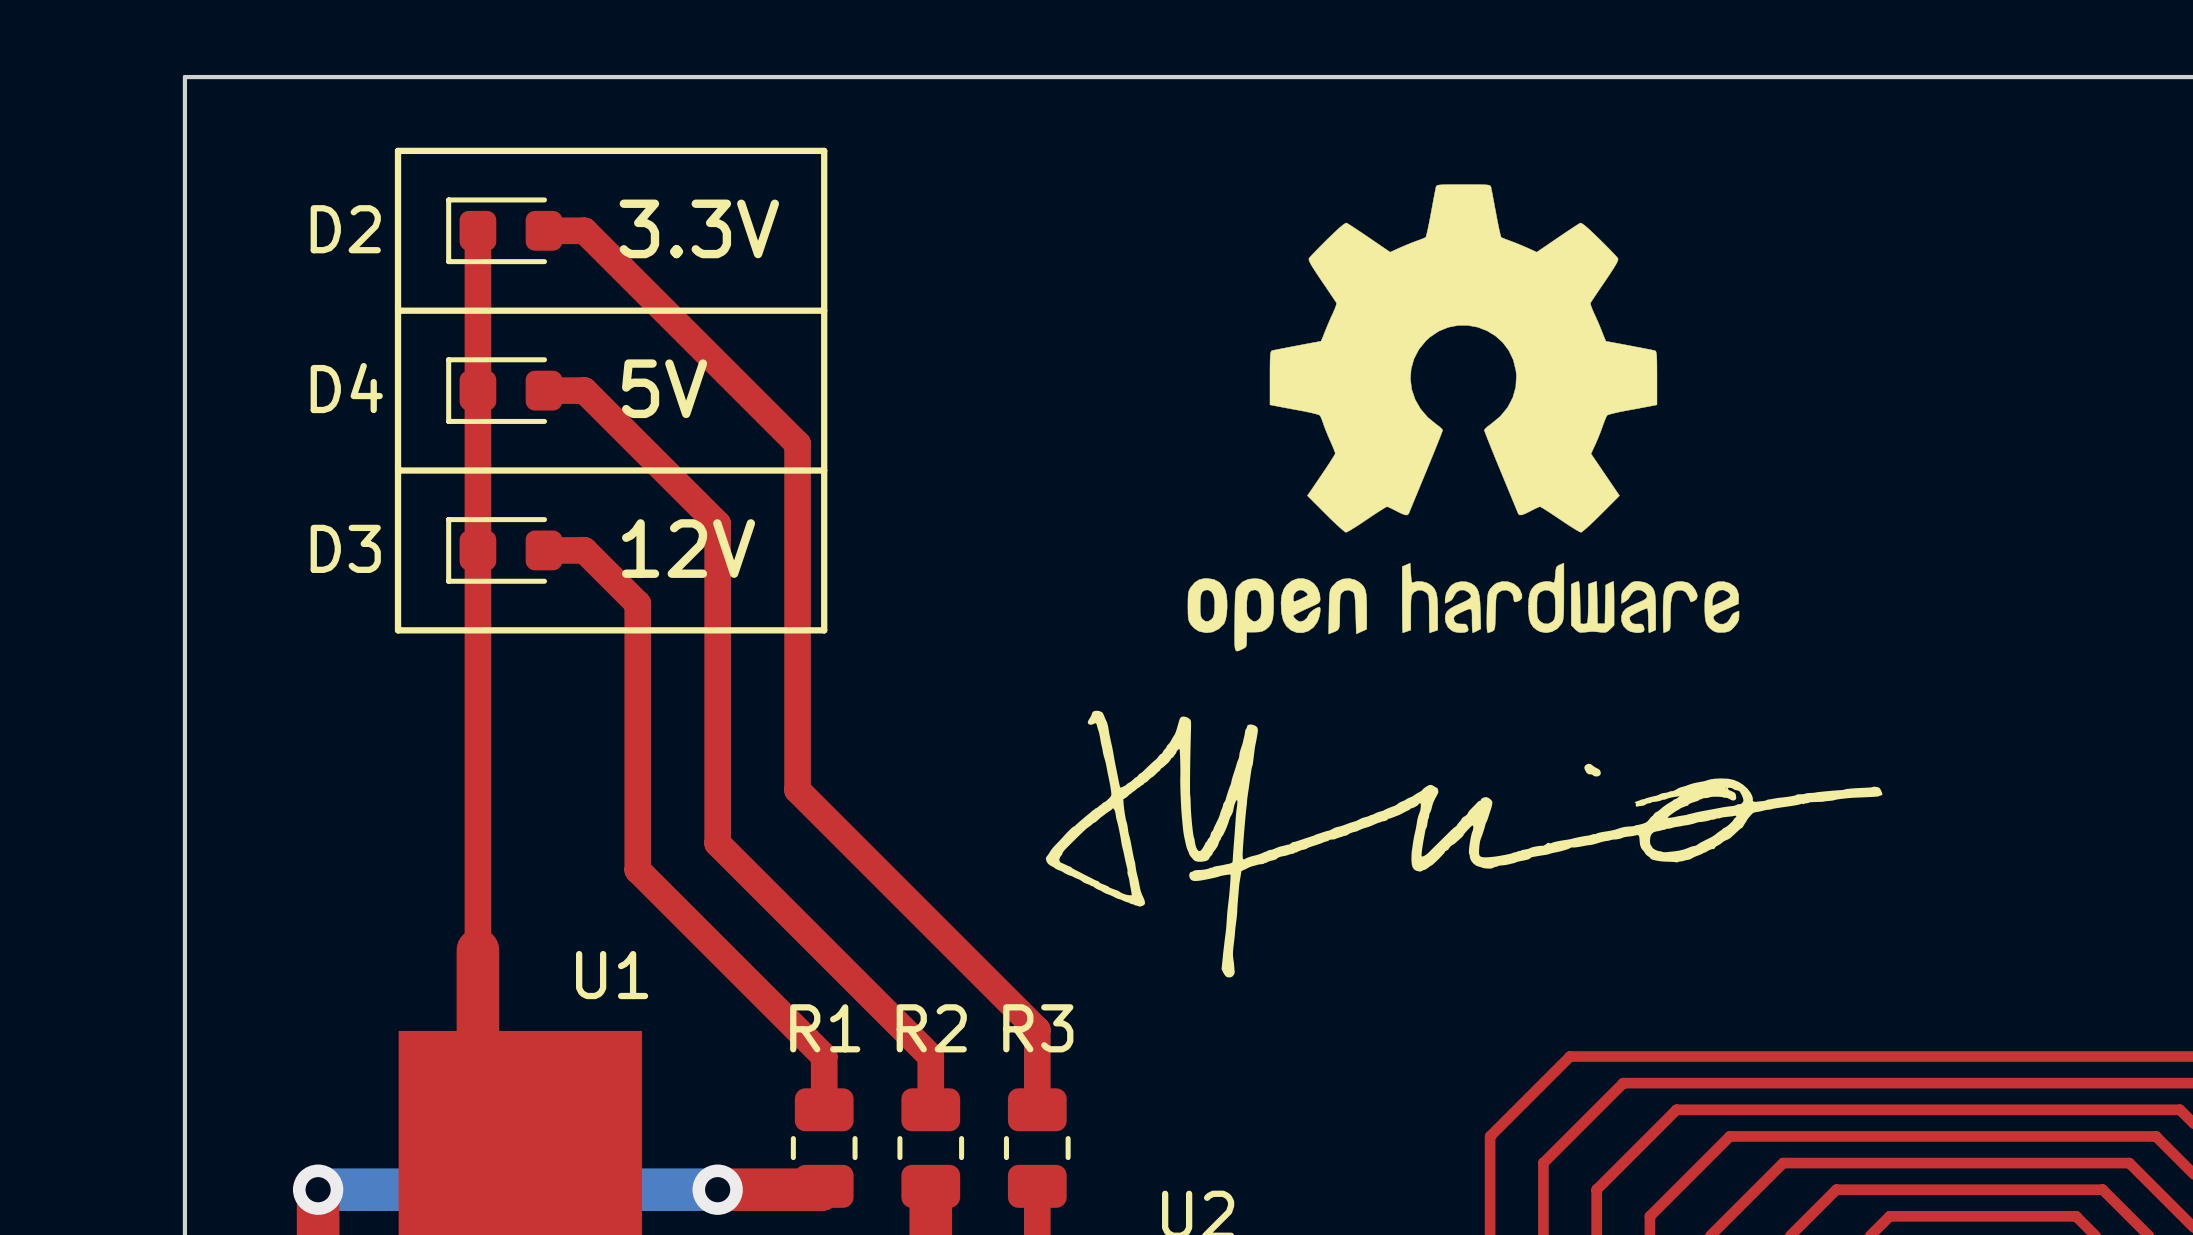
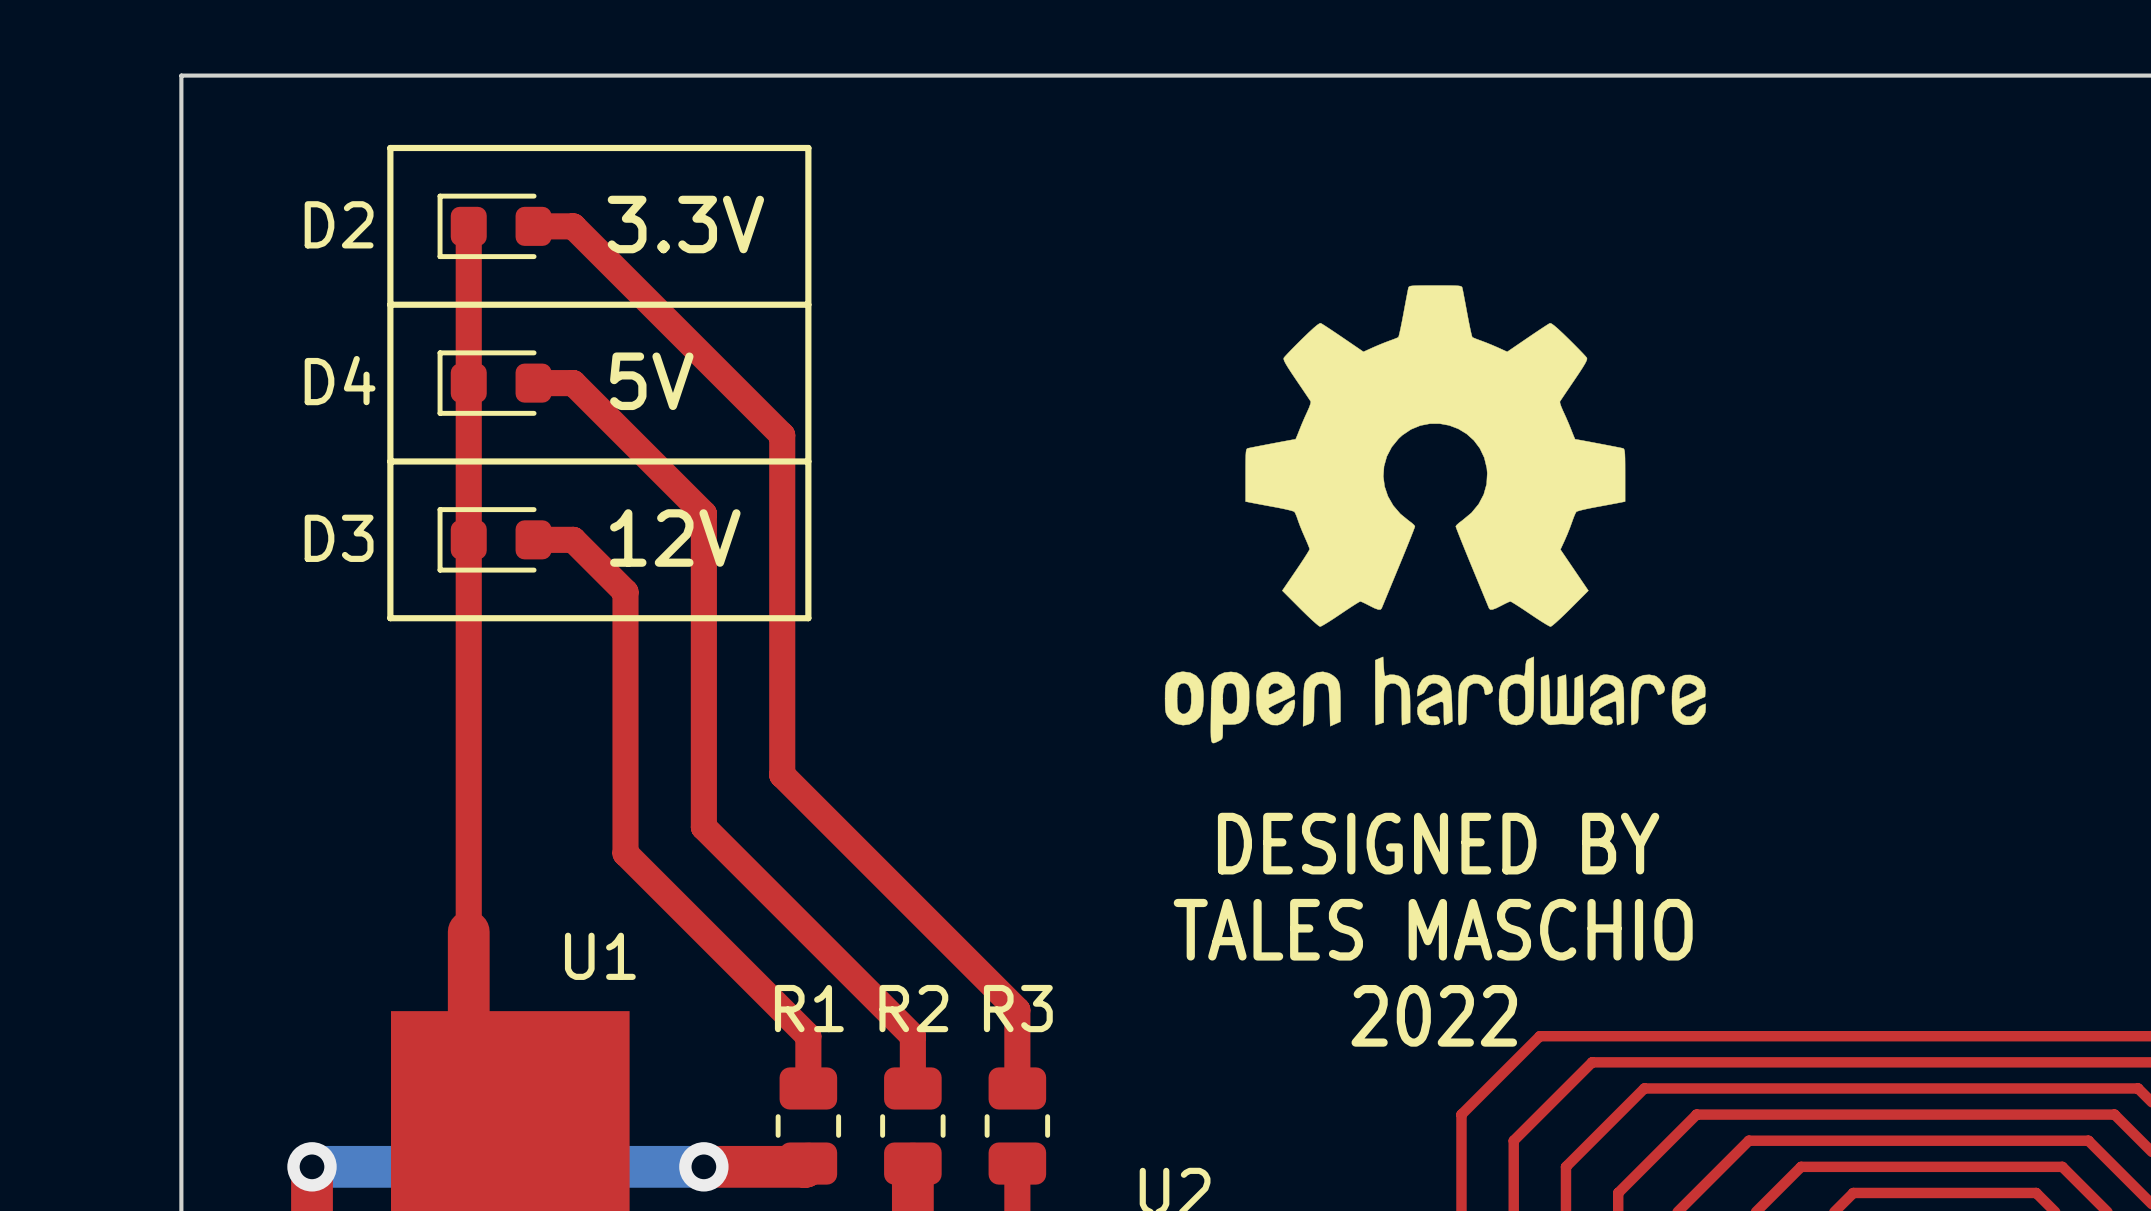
drawing position: (1463, 417) -> (1435, 514)
drawing: [1045, 710, 1883, 978] -> none
text: none -> DESIGNED BY (1438, 843)
text: none -> TALES MASCHIO (1433, 929)
text: none -> 2022 (1434, 1015)

